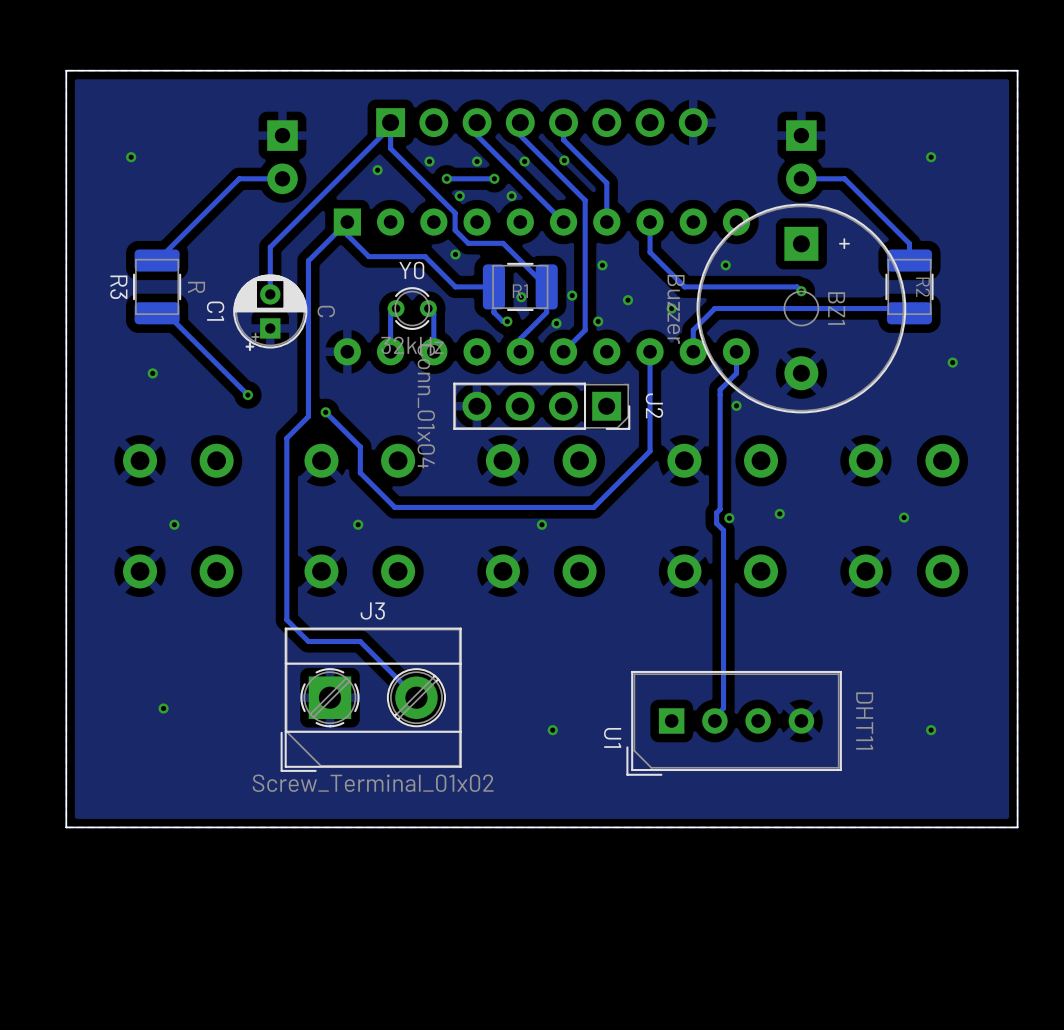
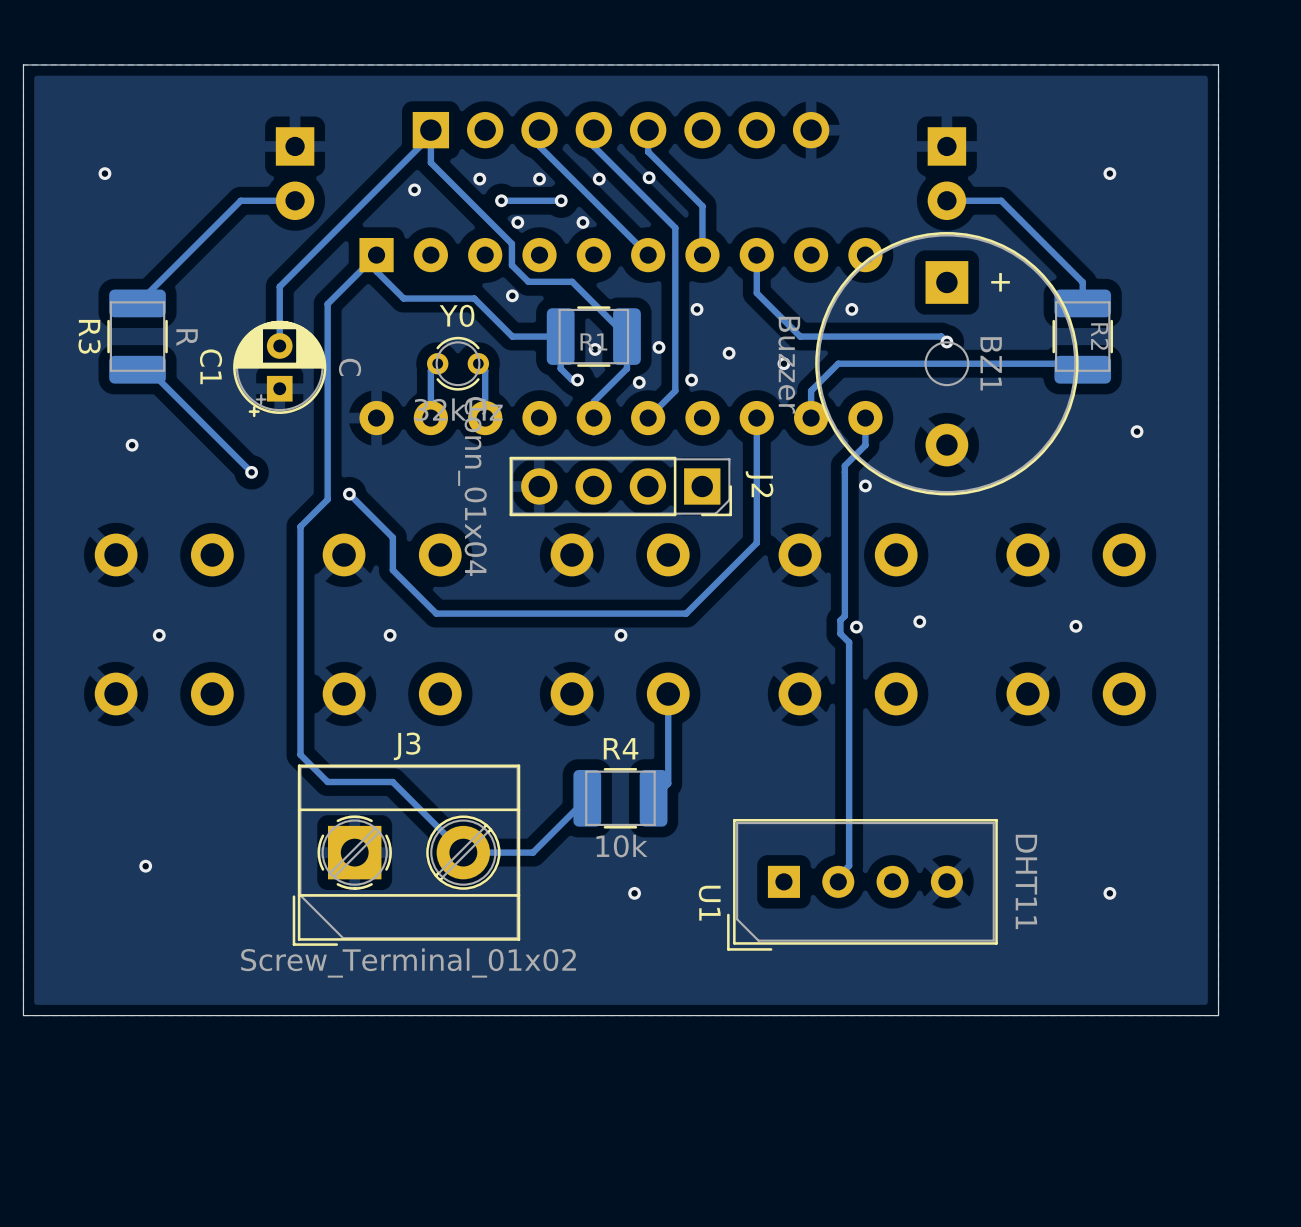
track: none -> (668, 693) (668, 783) (653, 798)
track: none -> (587, 798) (532, 852) (463, 852)
R4: none -> 10k (620, 798)

